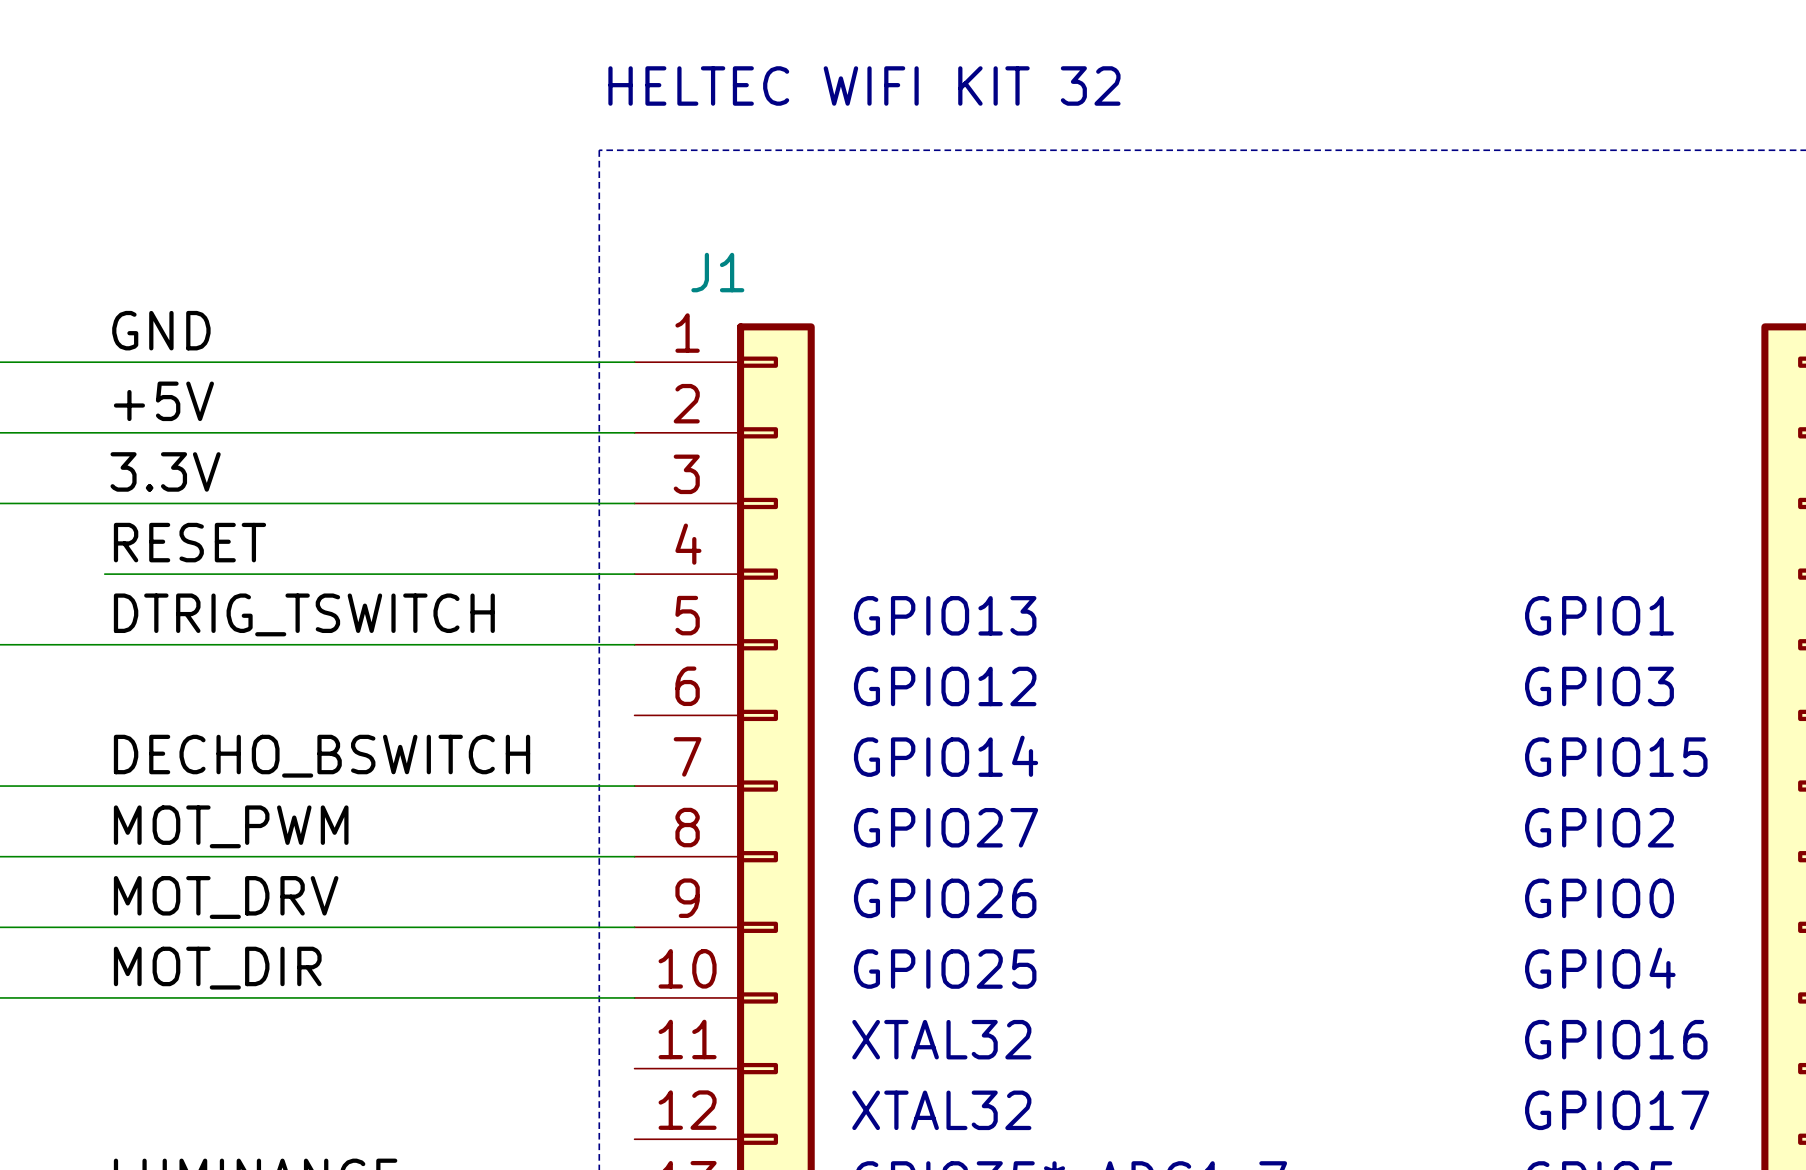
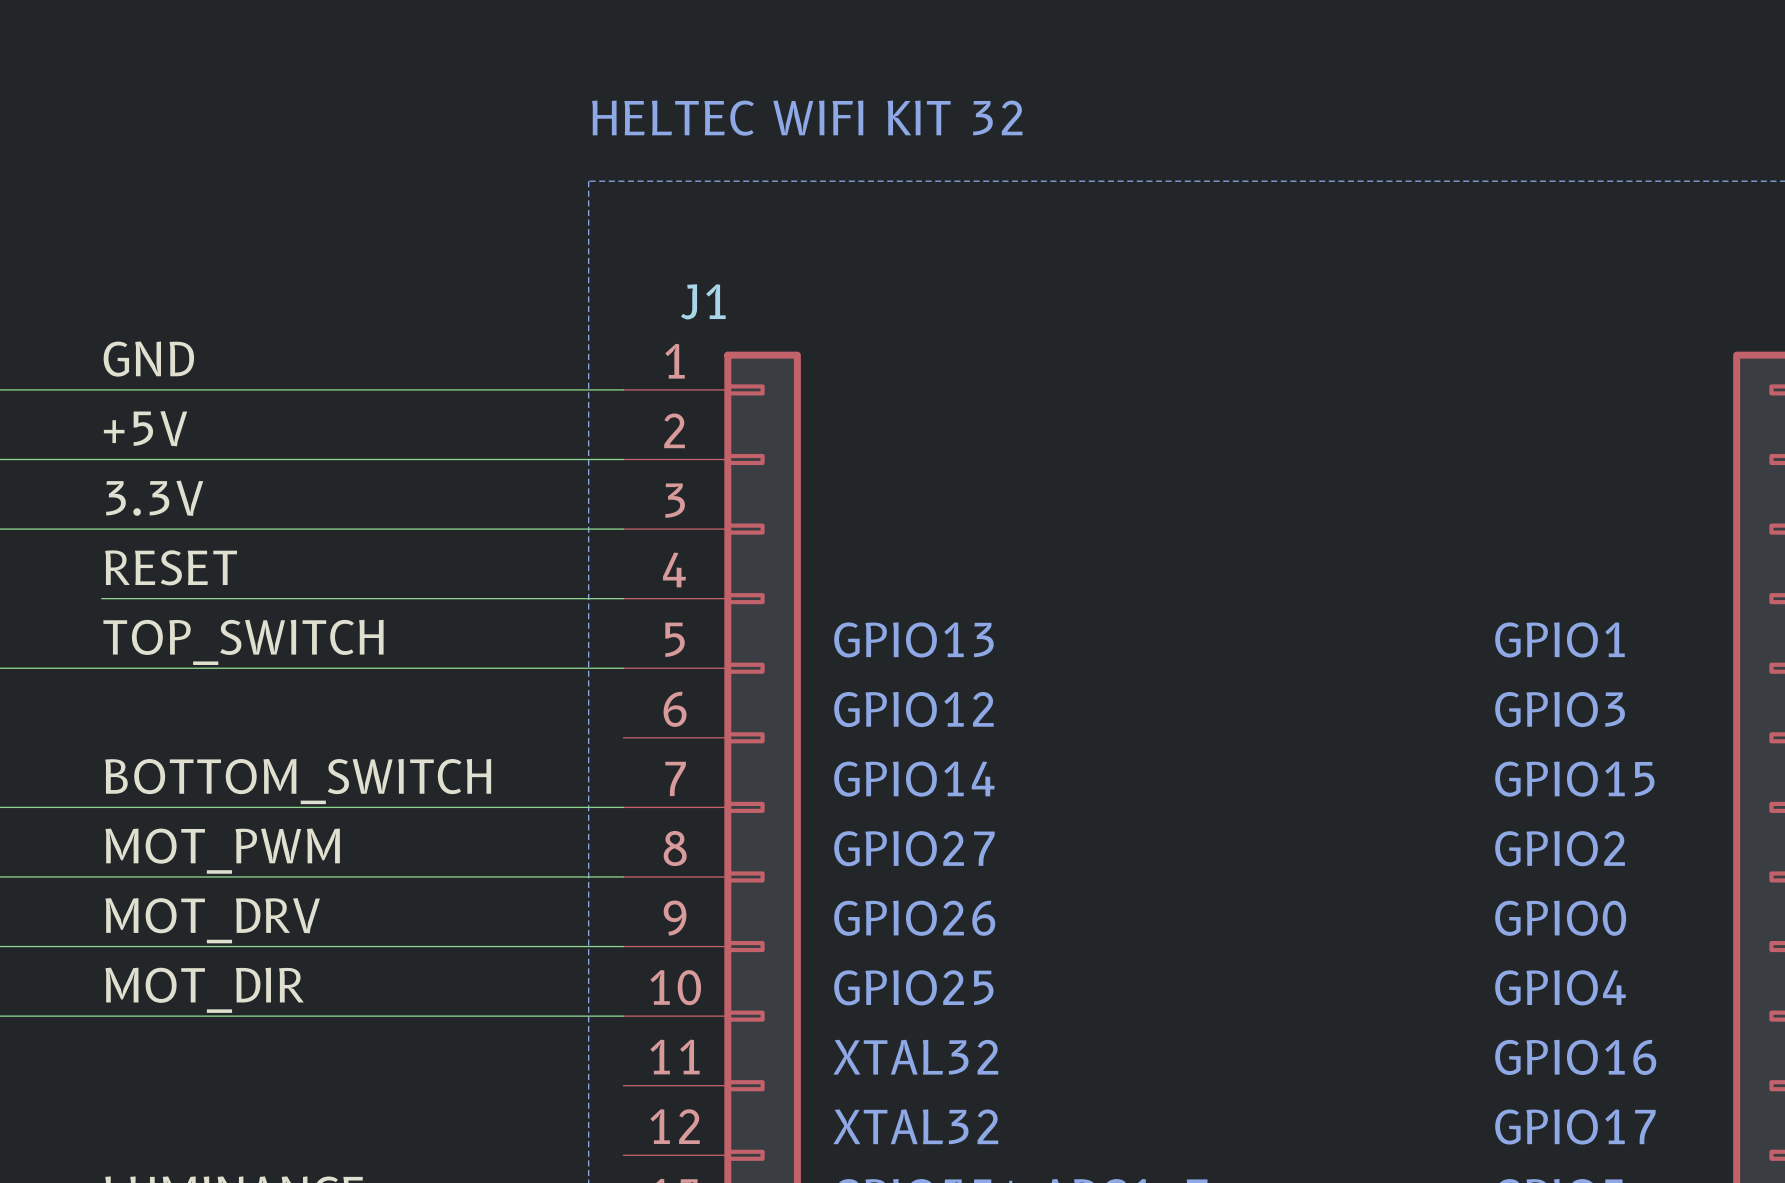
label: DTRIG_TSWITCH (304, 614) -> TOP_SWITCH (243, 642)
label: DECHO_BSWITCH (322, 756) -> BOTTOM_SWITCH (298, 781)

